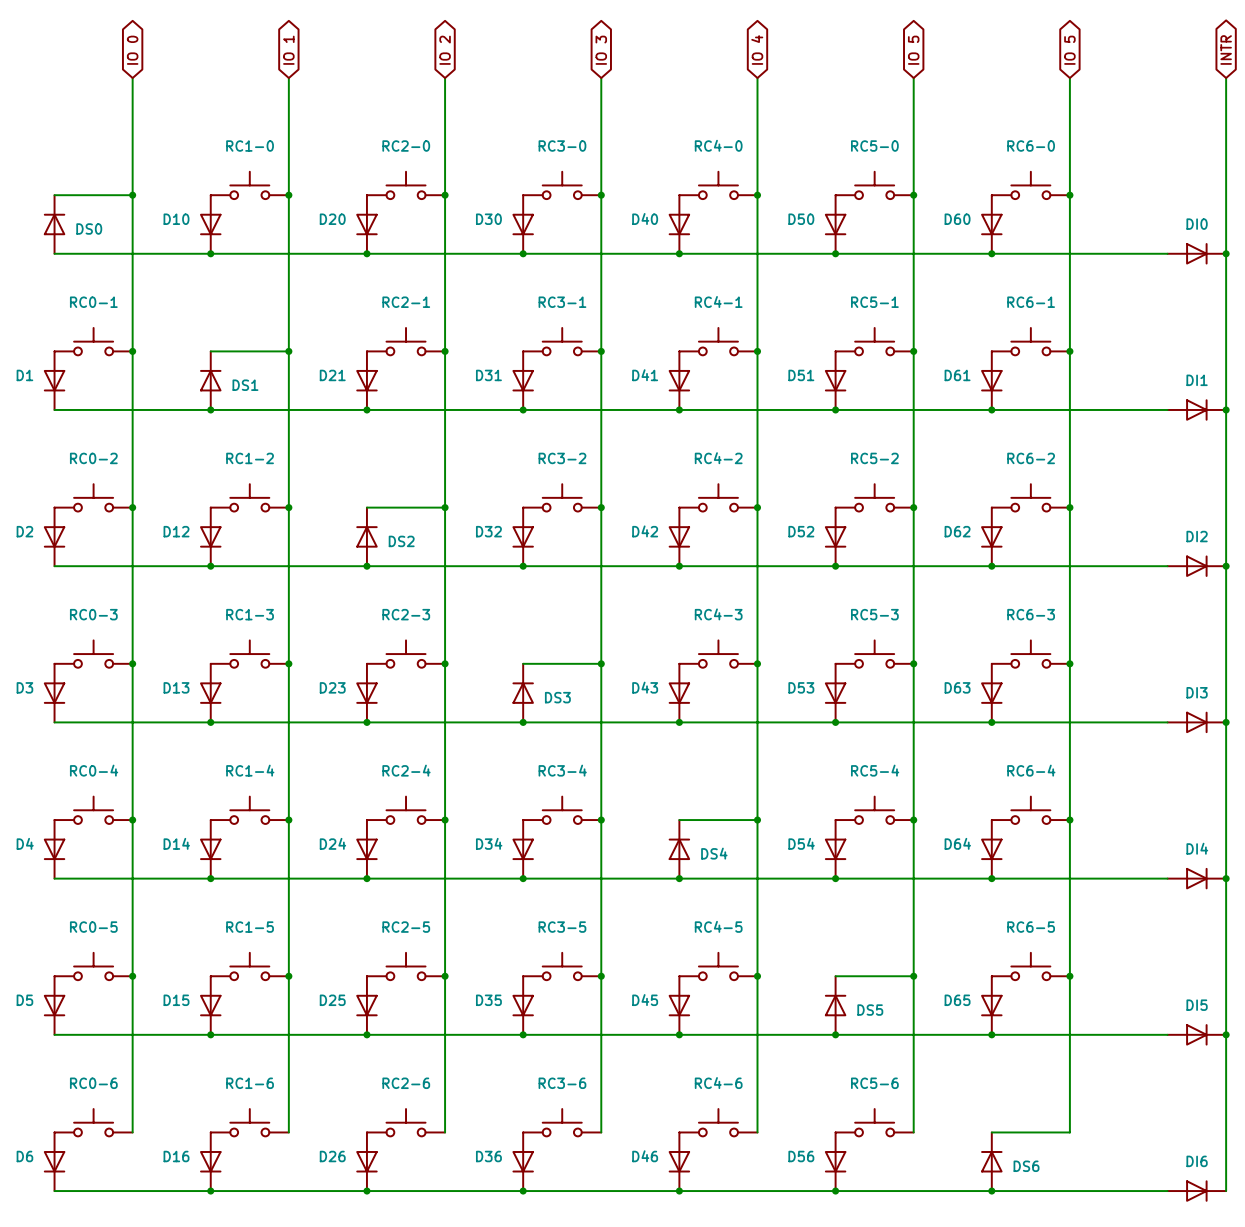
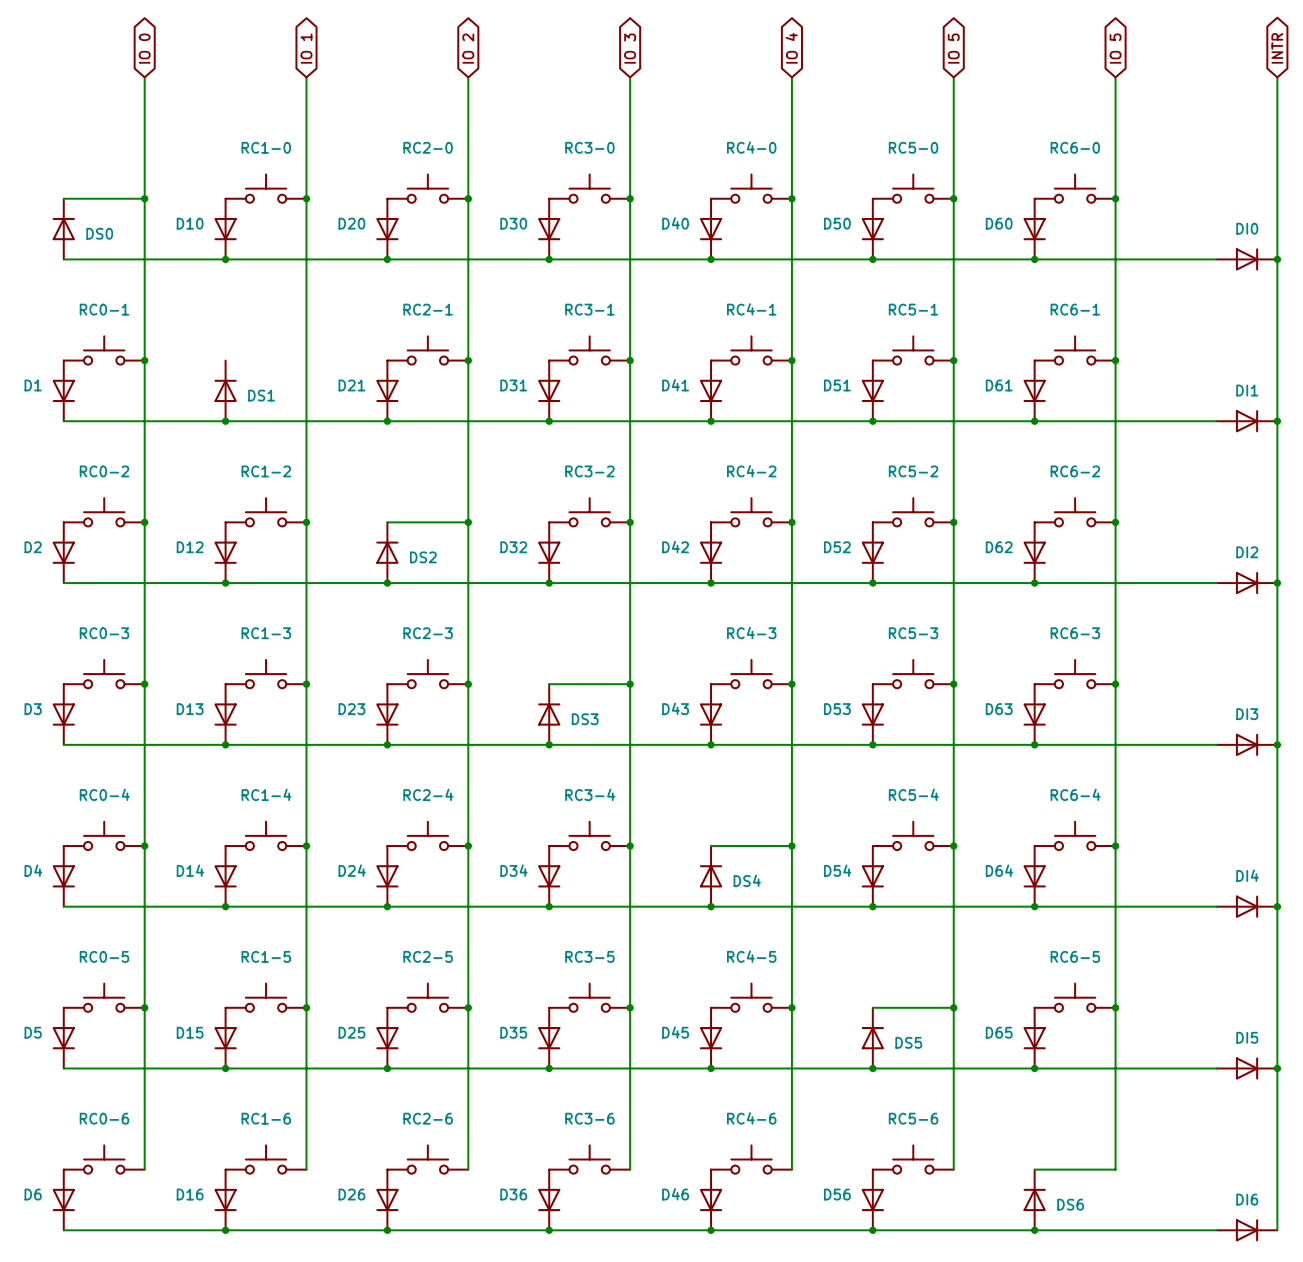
wire: (210, 351) (288, 351) -> none
junction: (288, 351) -> none

